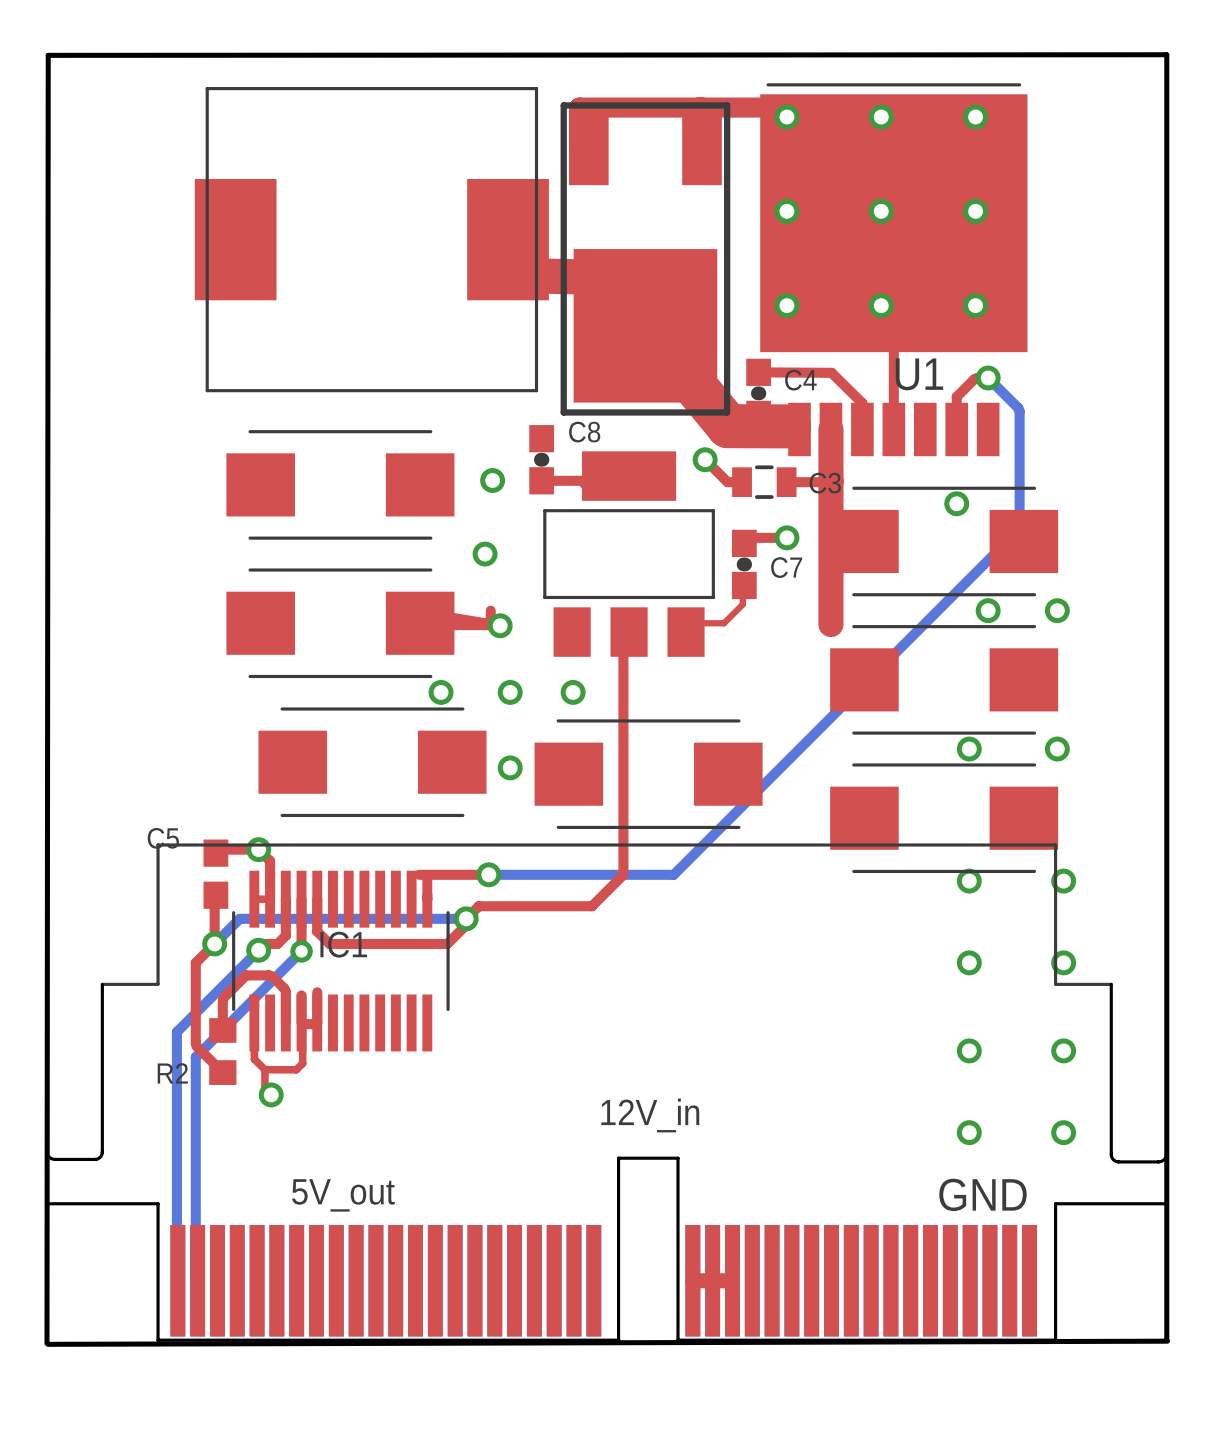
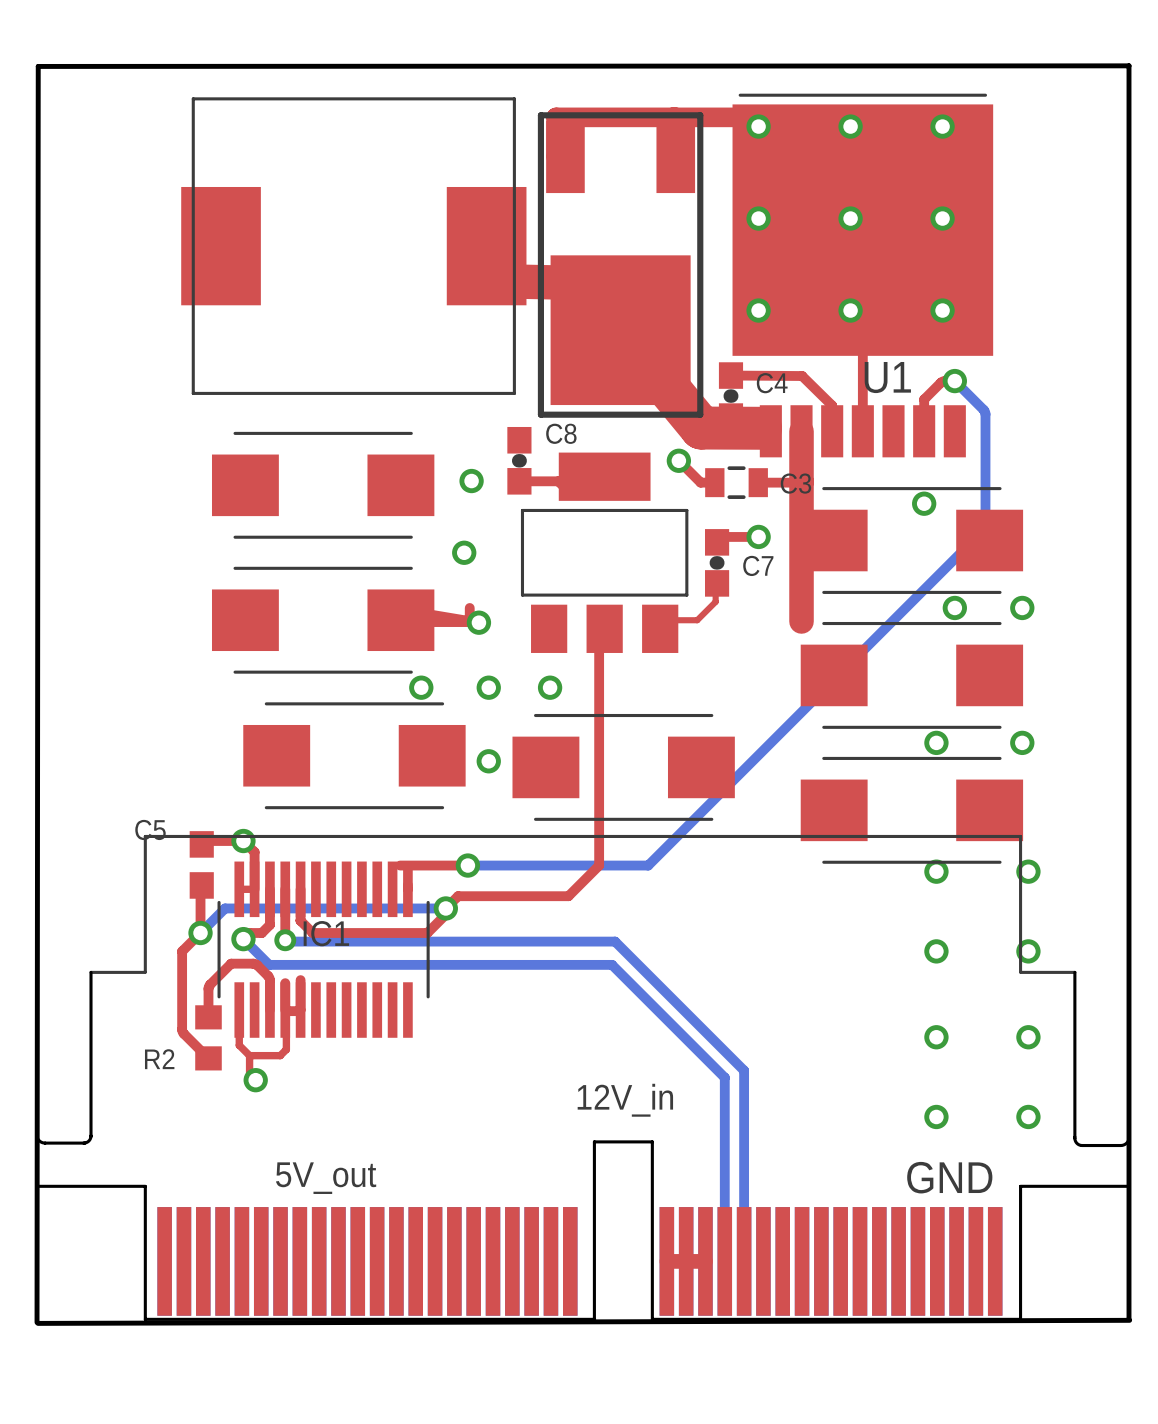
bottom track: (258, 950) (176, 1032) (177, 1280) -> (243, 939) (269, 964) (612, 964) (724, 1077) (724, 1261)
bottom track: (301, 951) (195, 1057) (195, 1278) (197, 1280) -> (285, 940) (615, 941) (744, 1070) (744, 1261)

